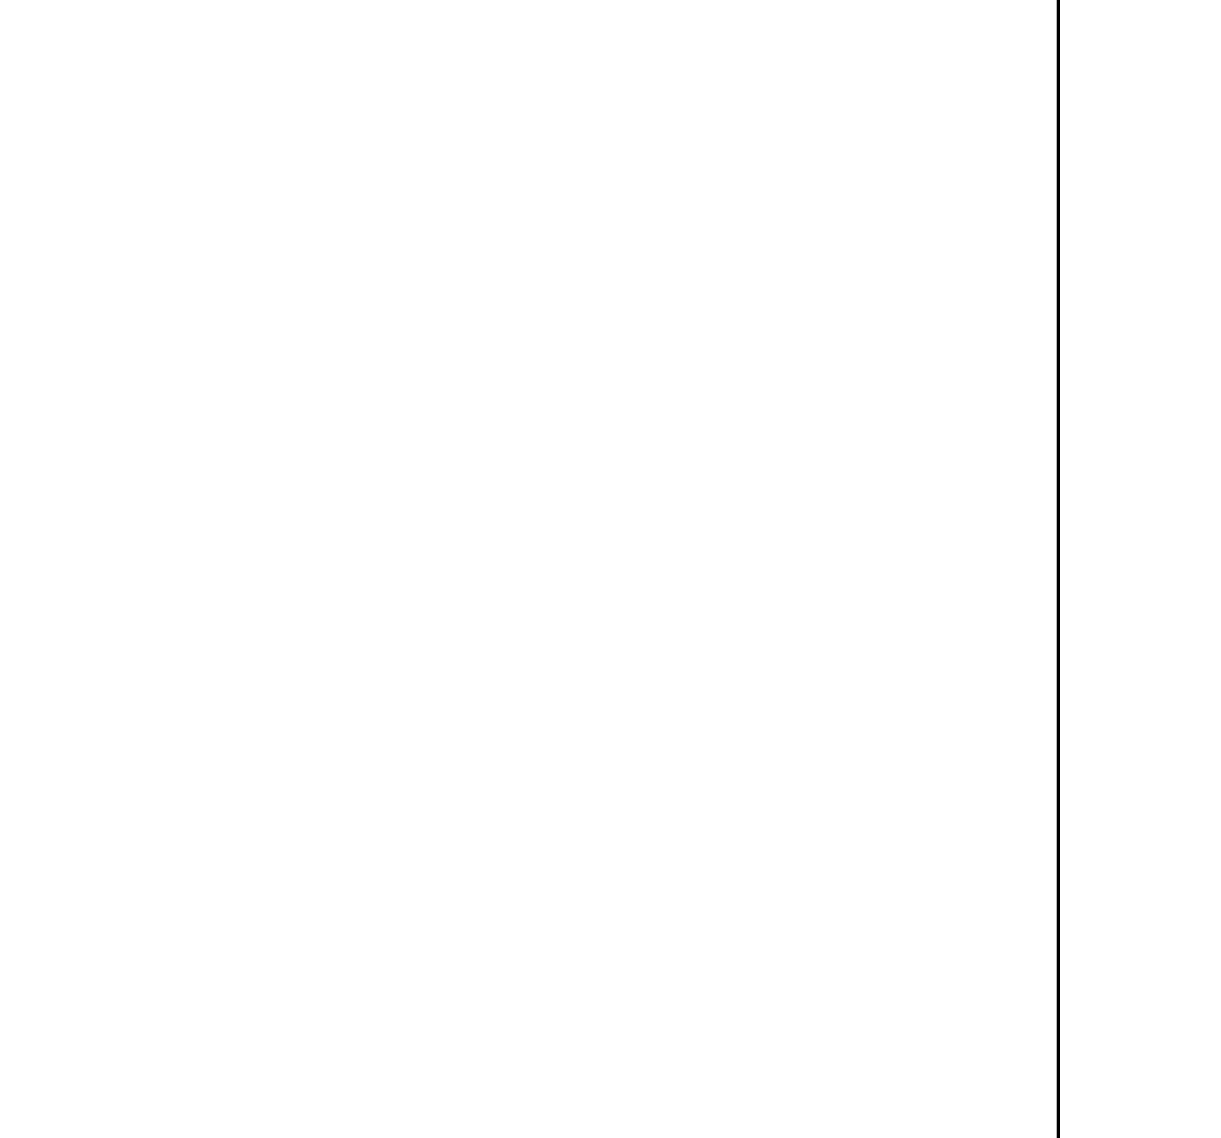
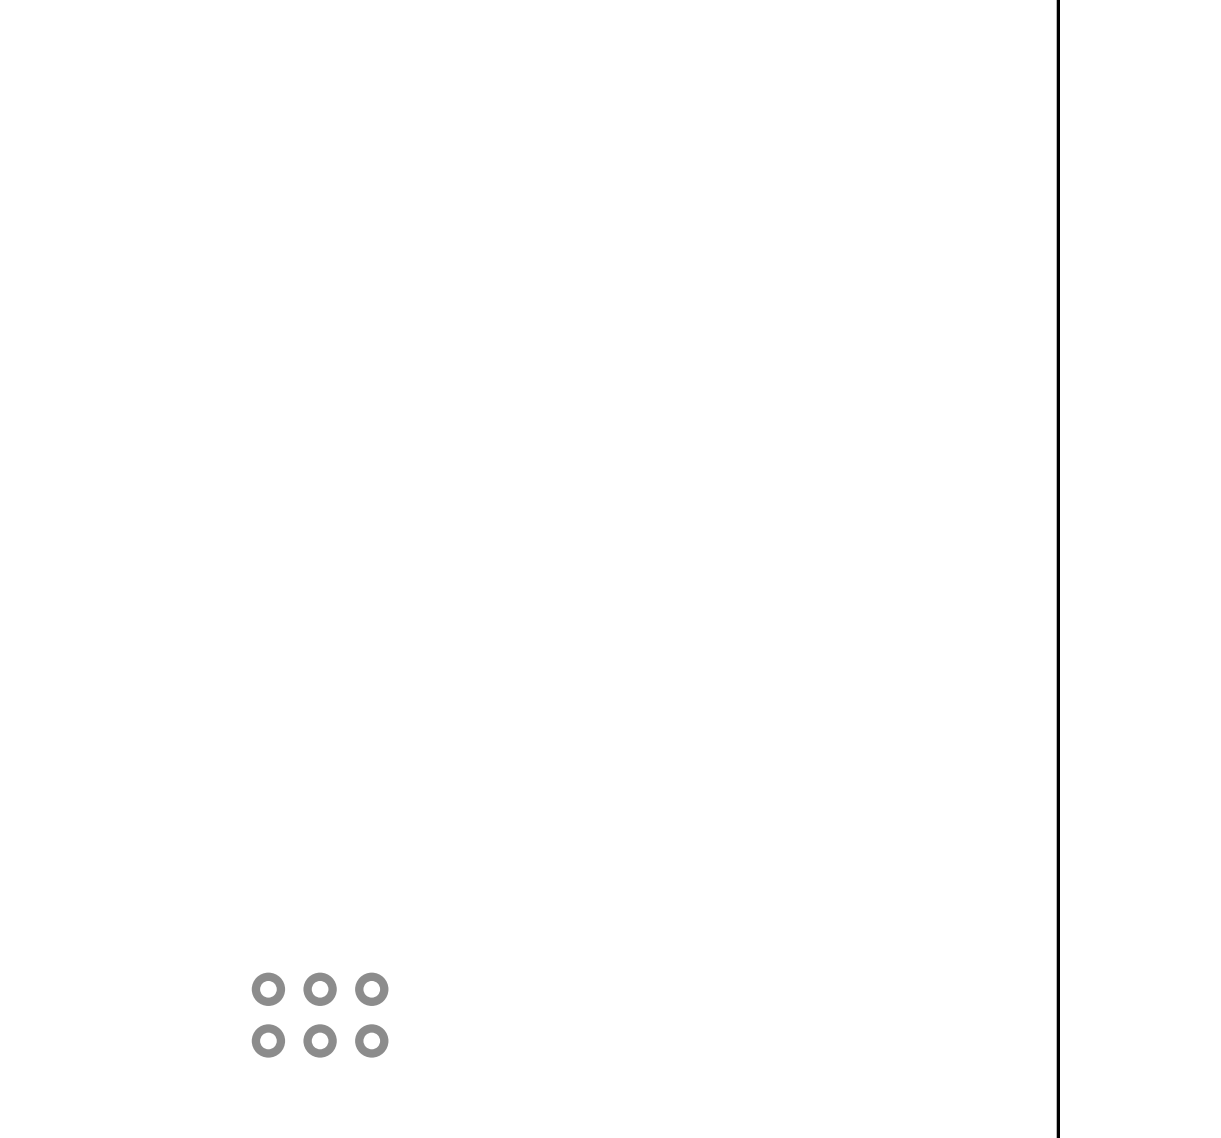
part: none -> (320, 1015)

